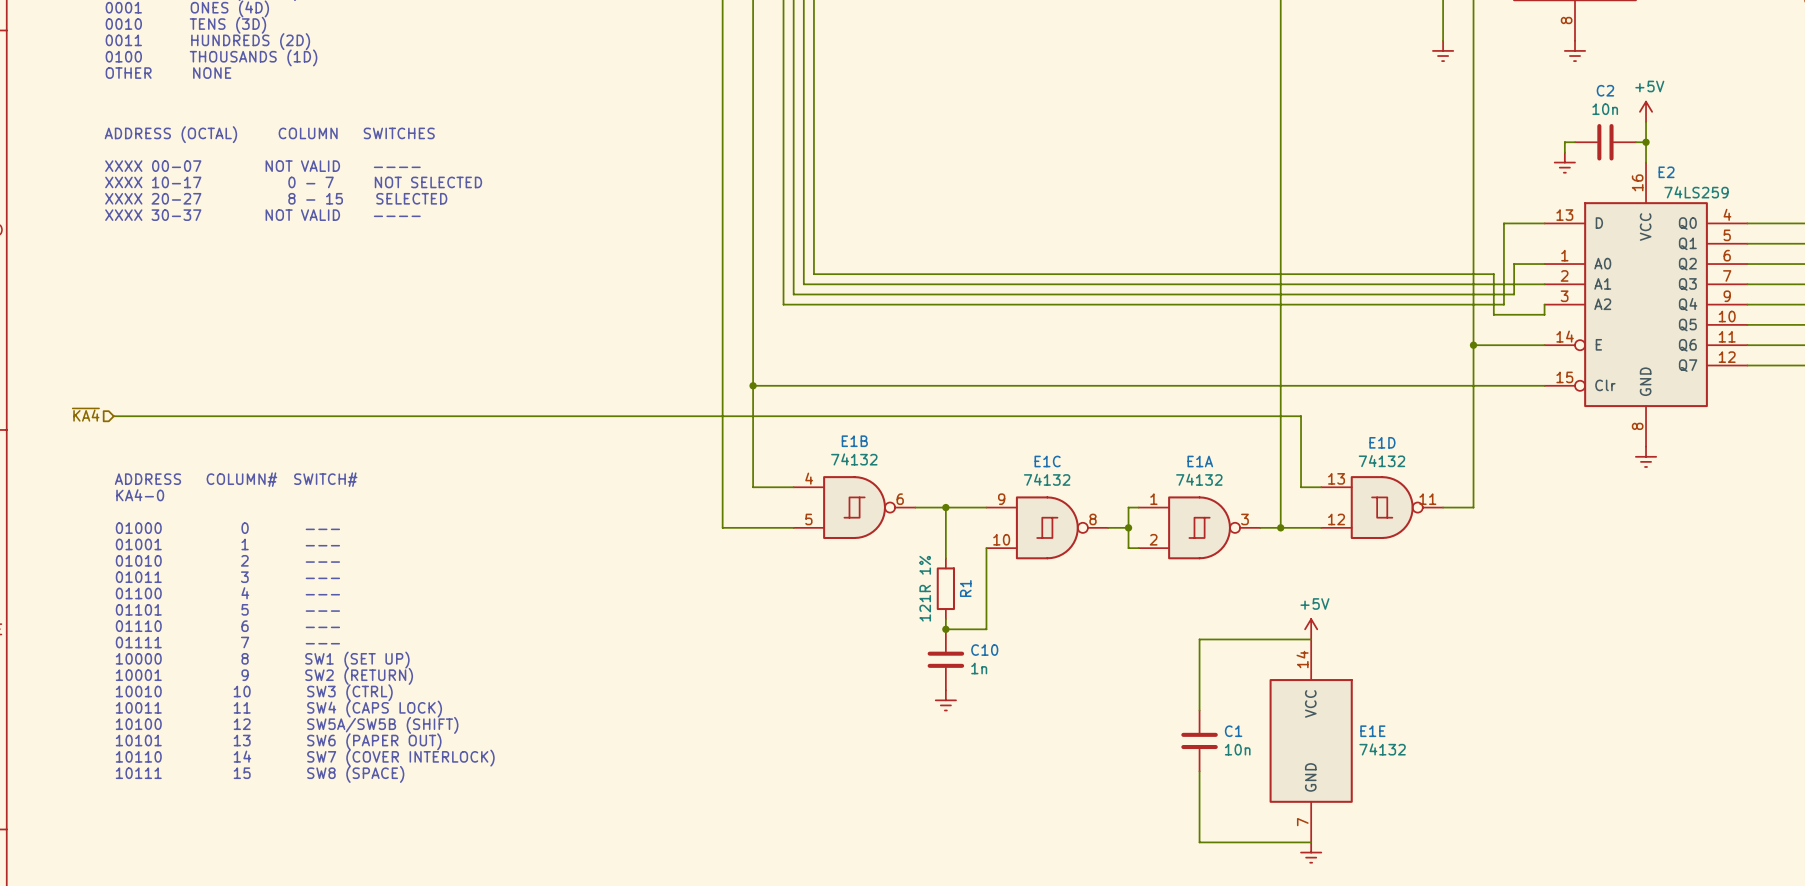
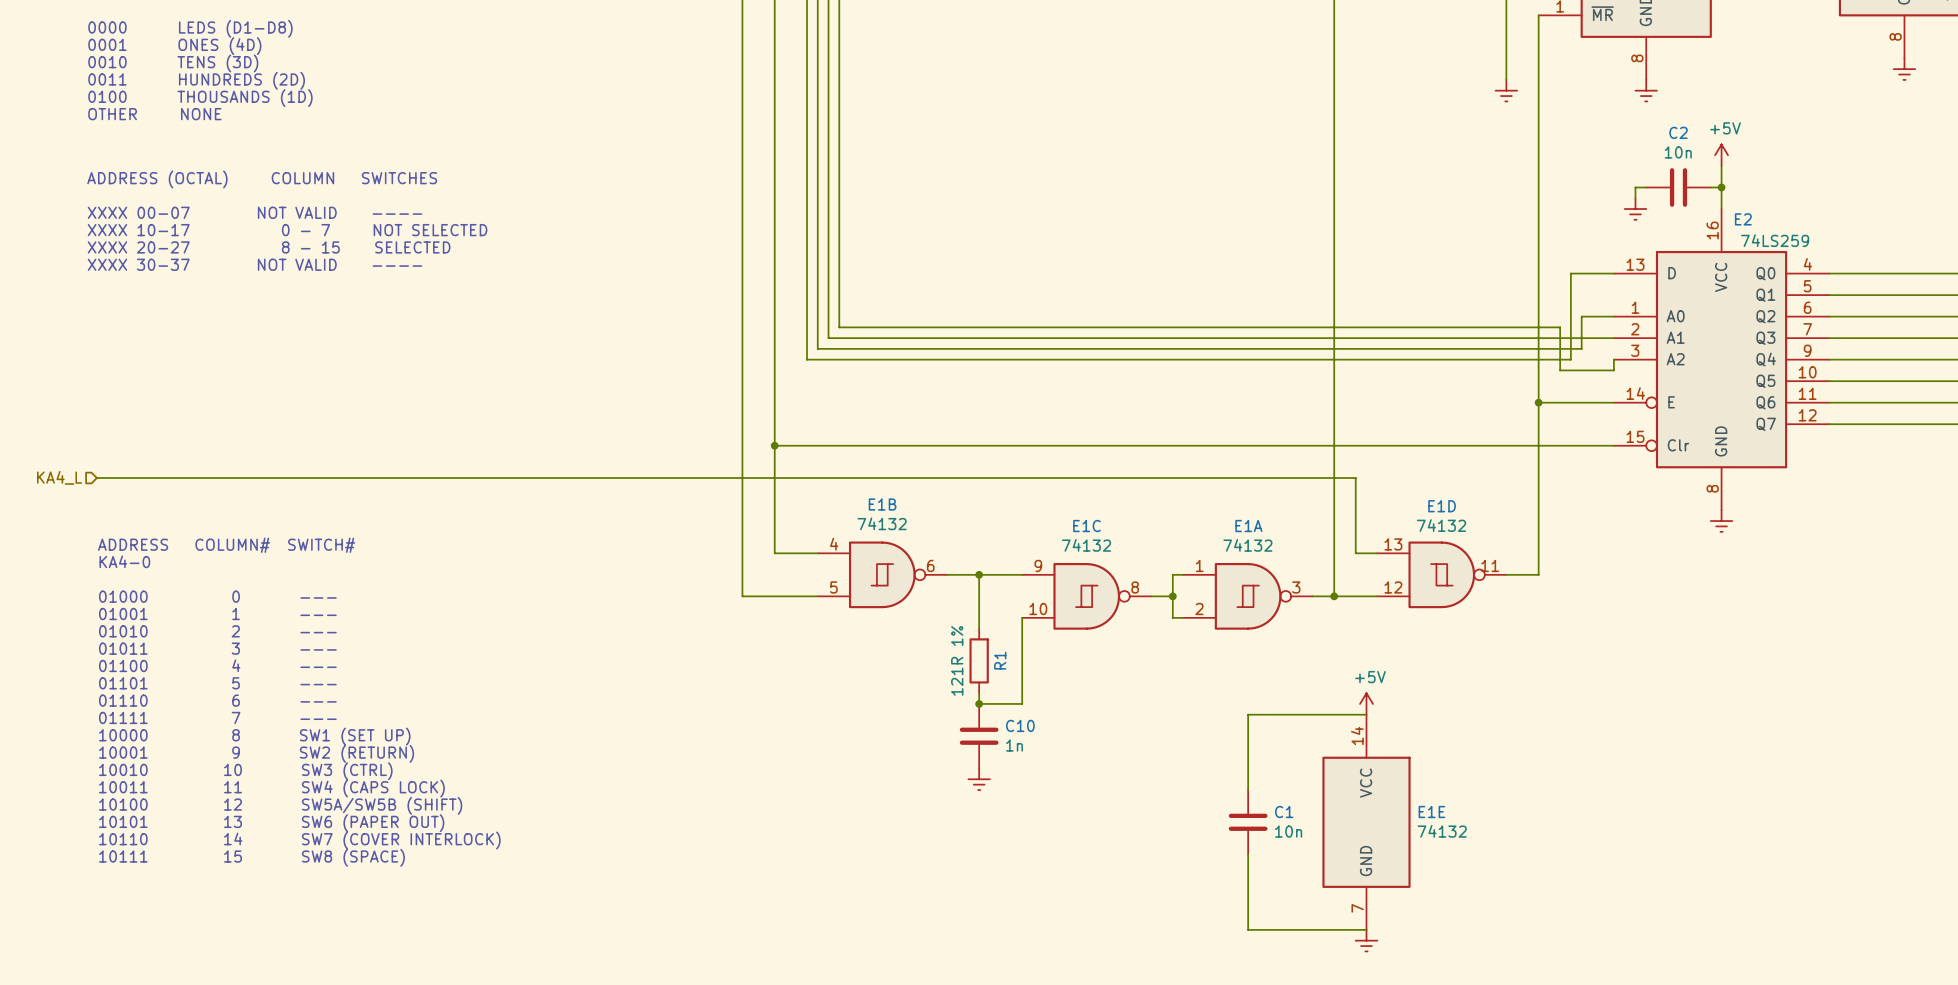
hierarchical label: ~{KA4} (85, 414) -> KA4_L (59, 477)

